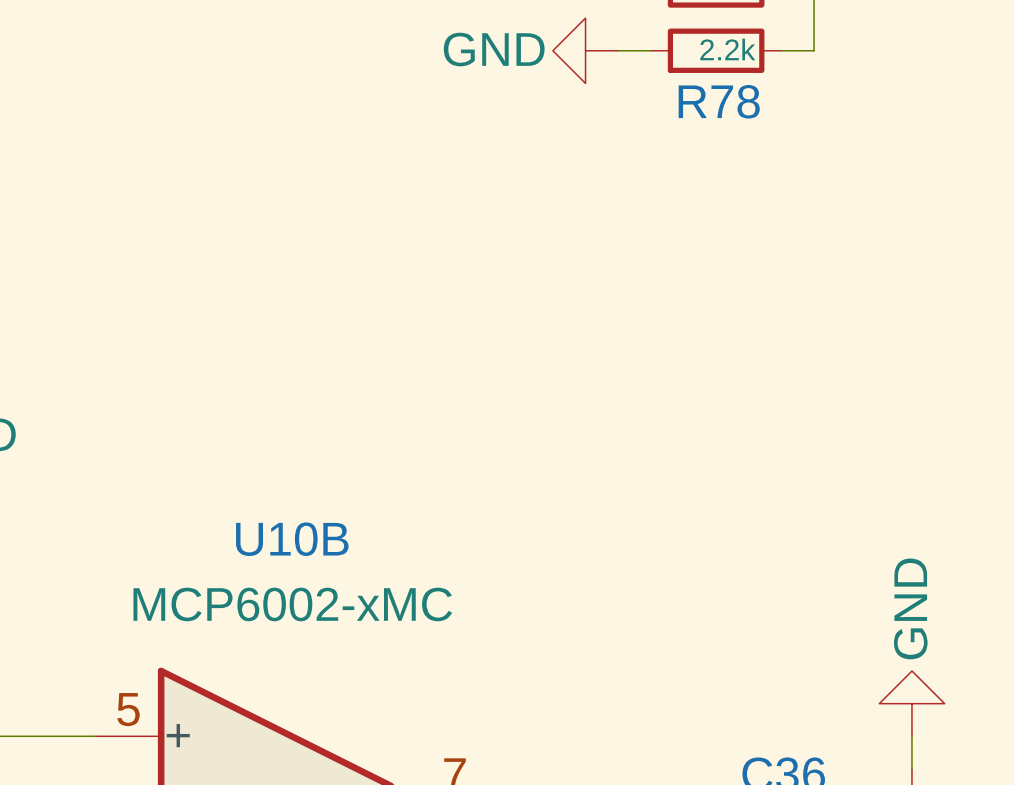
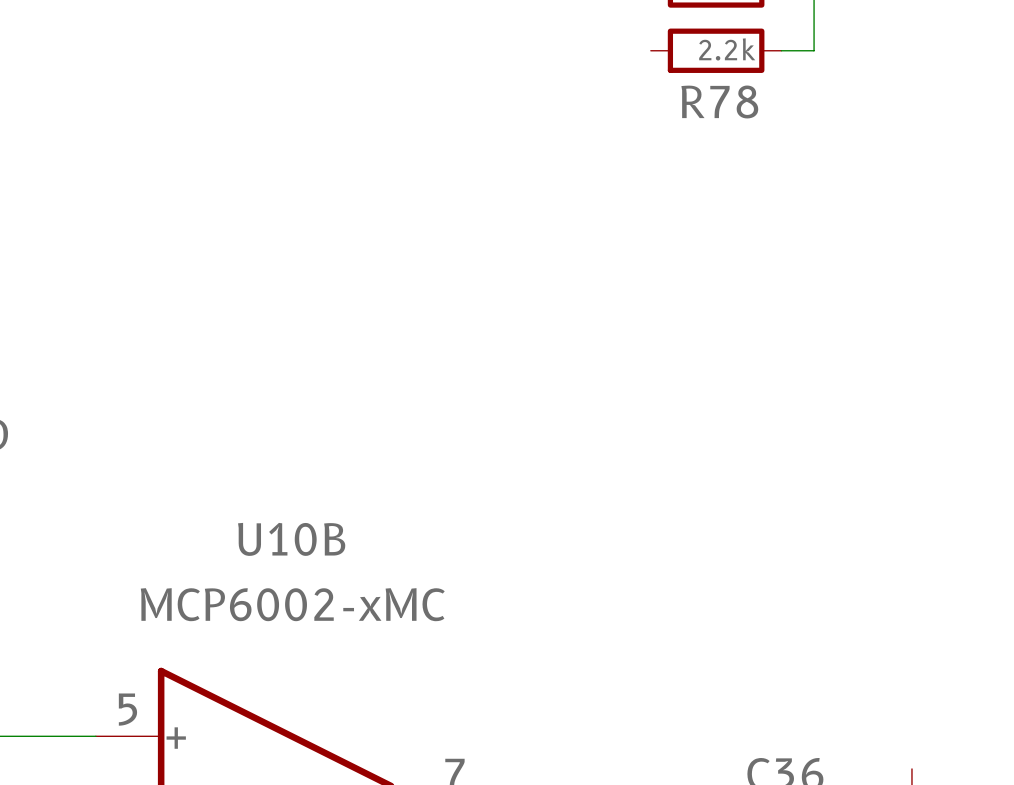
power symbol: GND (585, 50) -> none
wire: (618, 50) (650, 50) -> none
power symbol: GND (911, 703) -> none
wire: (911, 736) (911, 768) -> none

